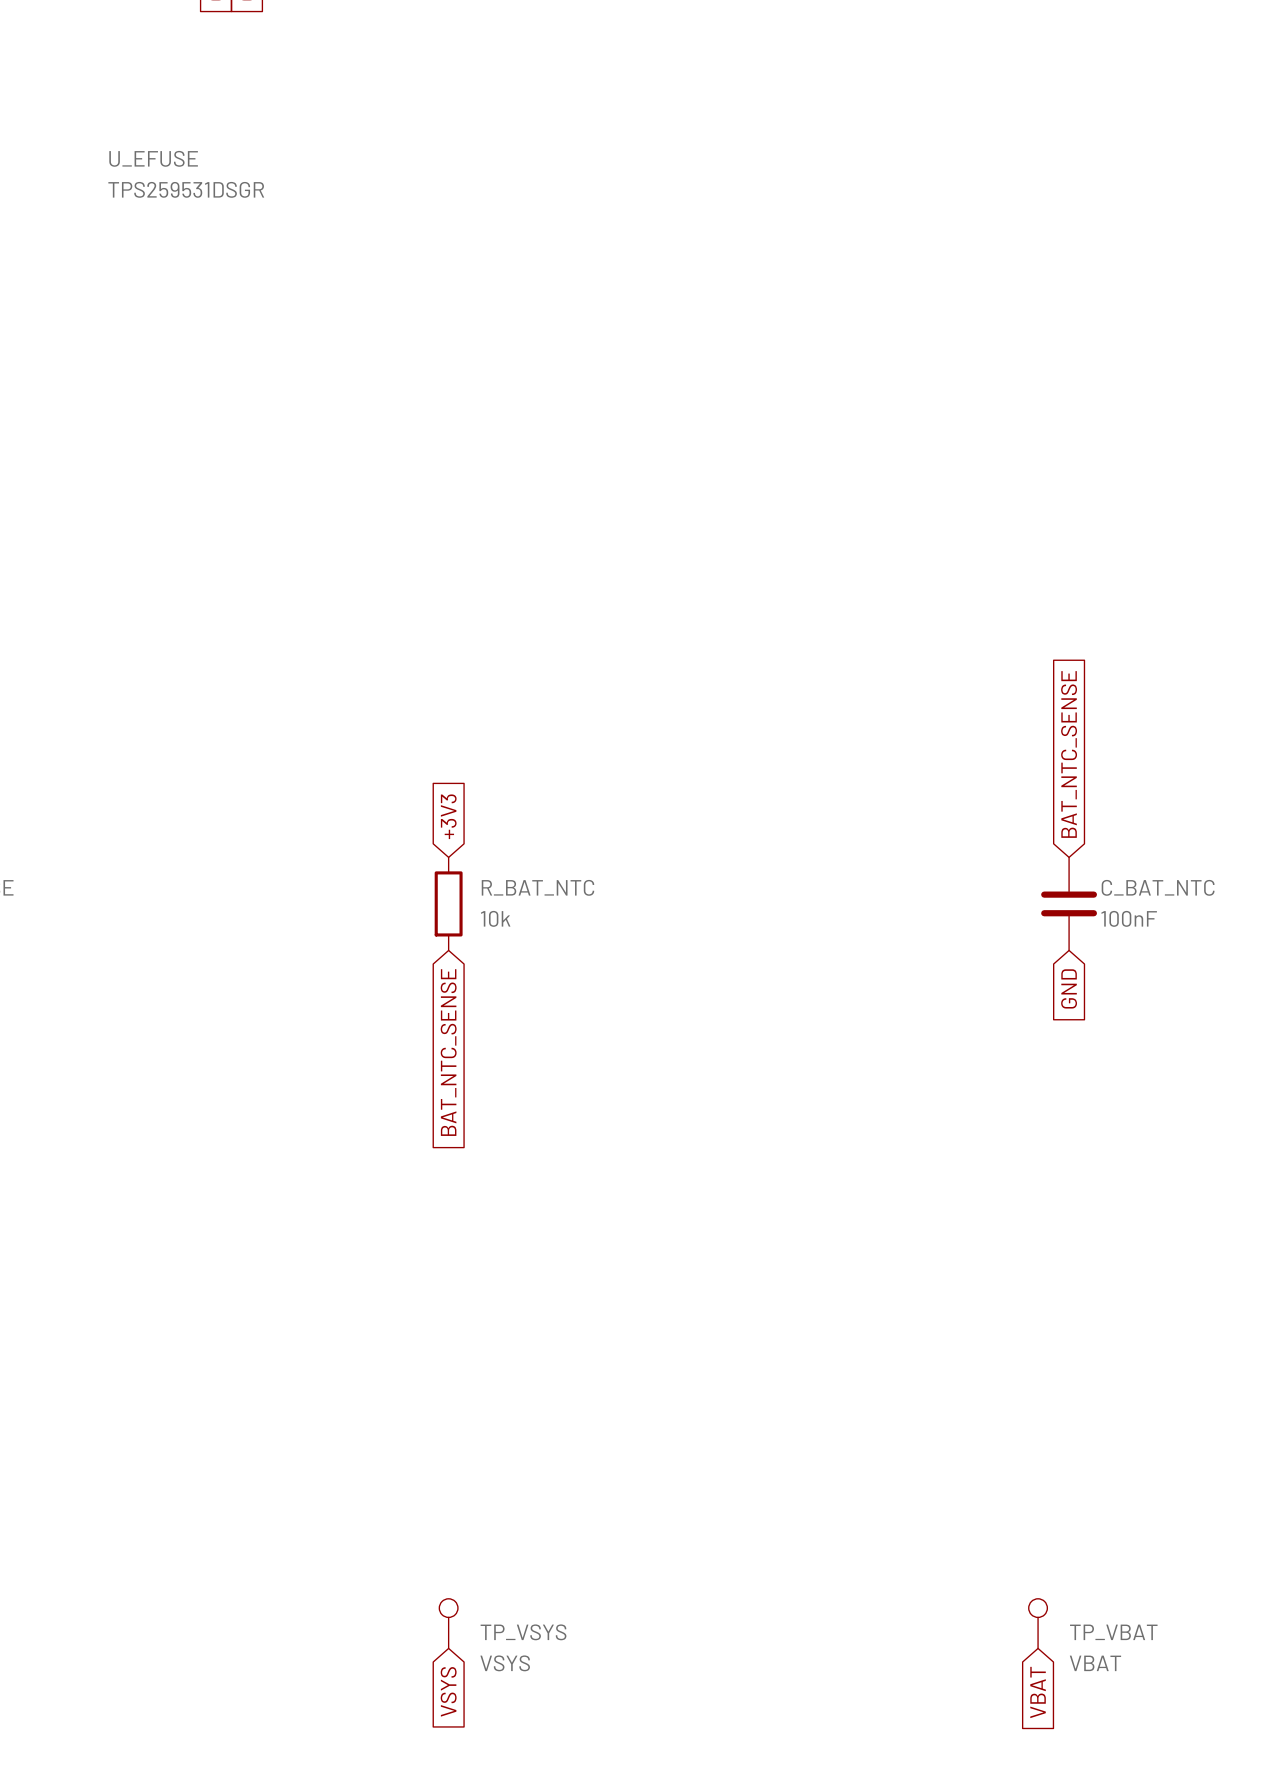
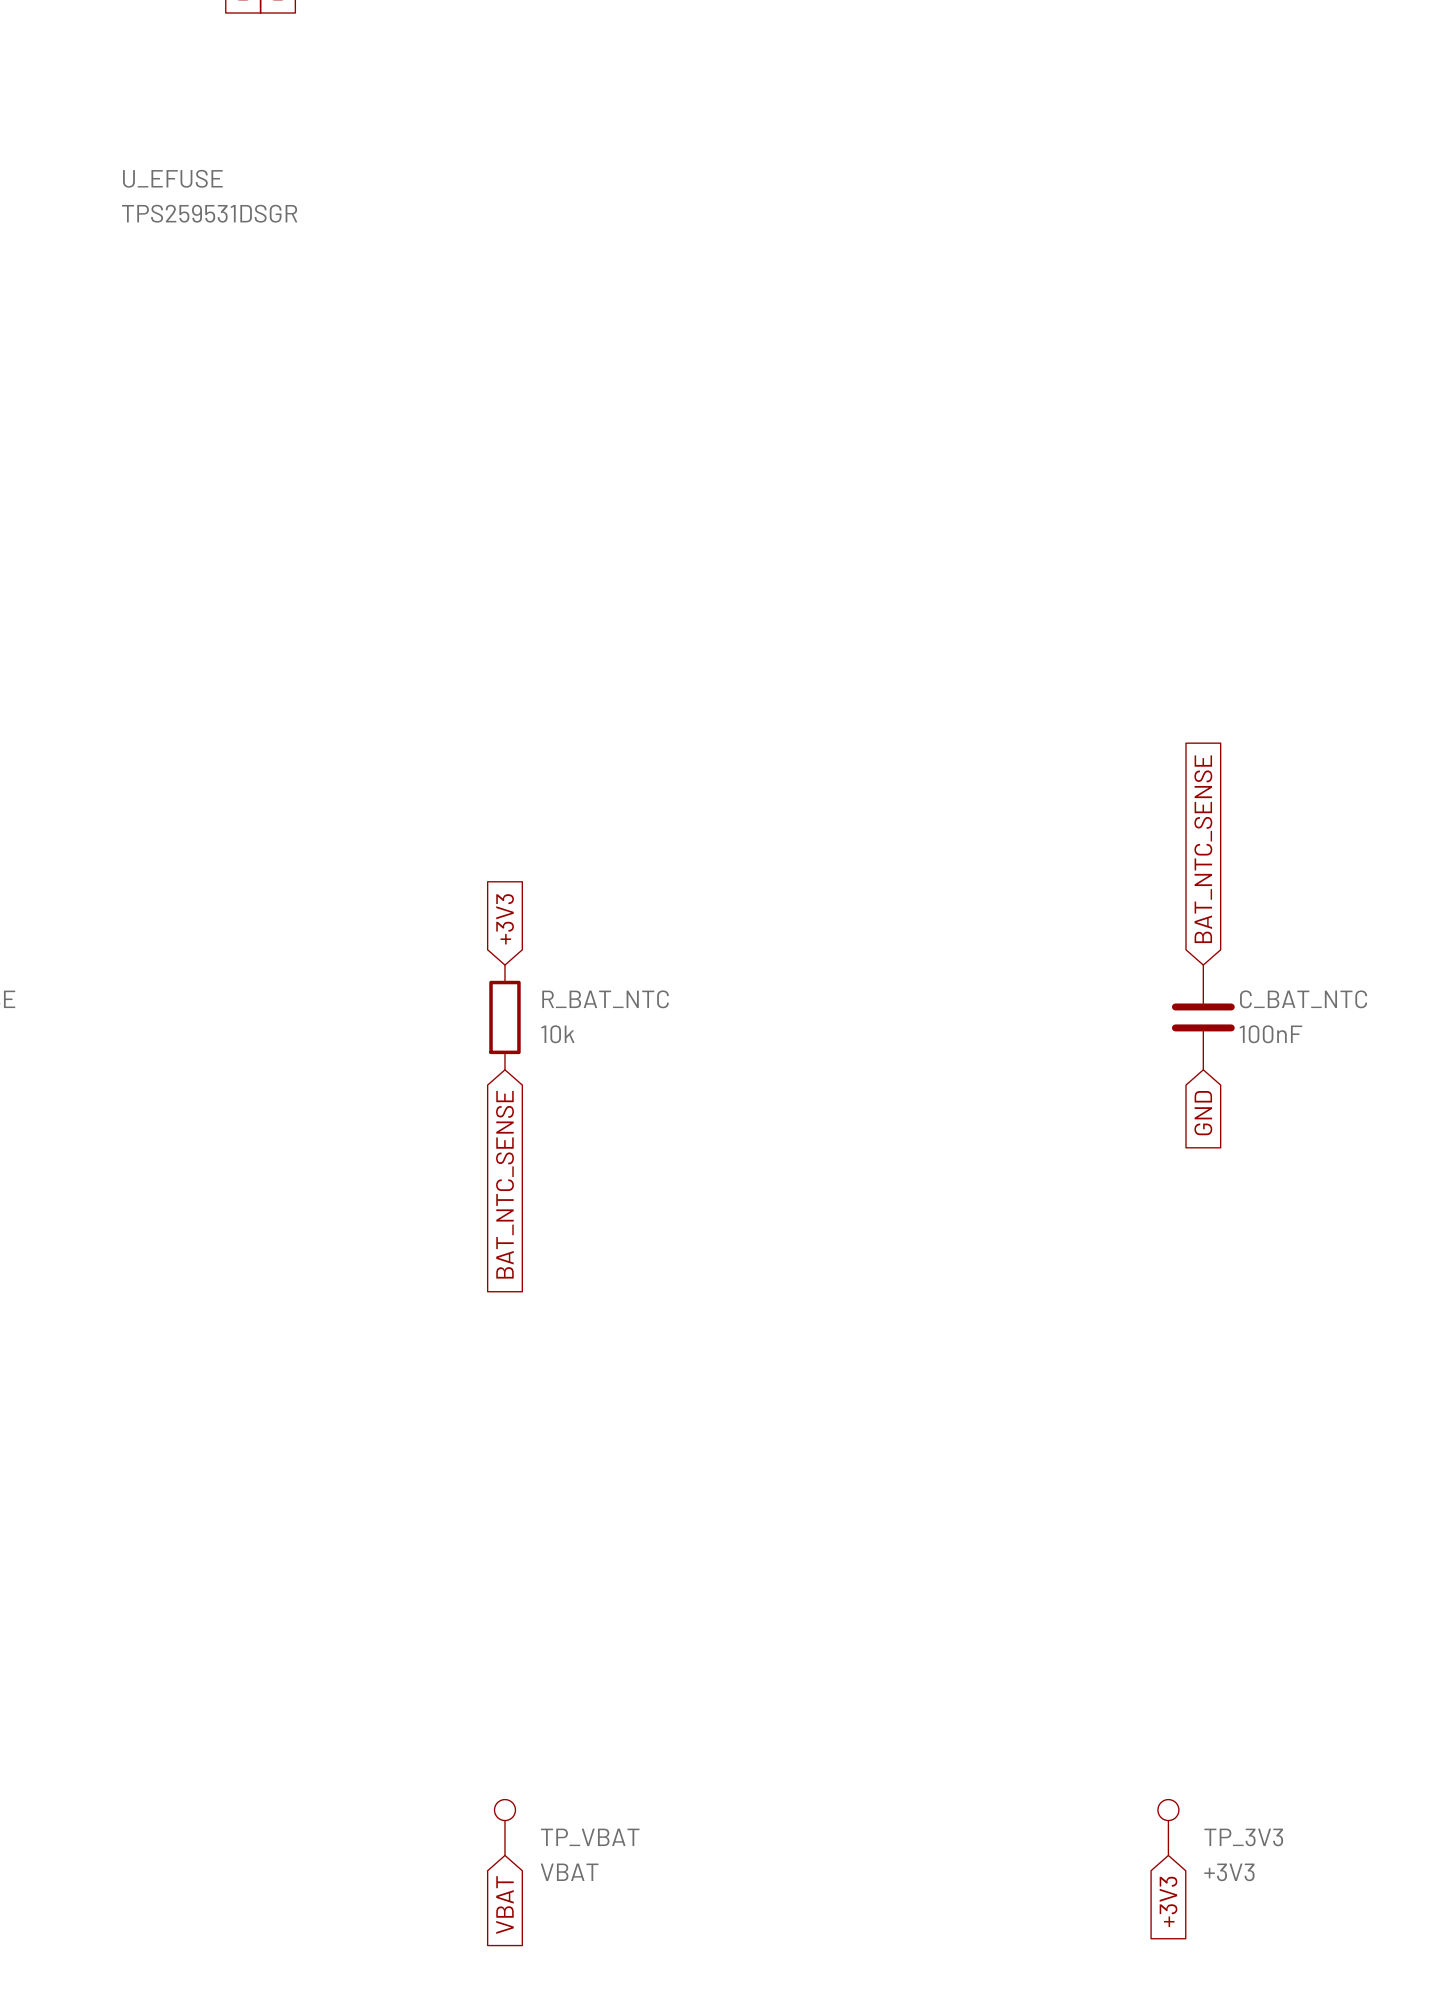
TP_VSYS name: TP_VSYS (523, 1632) -> TP_VBAT (590, 1837)
TP_VBAT name: TP_VBAT (1113, 1632) -> TP_3V3 (1243, 1837)
TP_VSYS value: VSYS (505, 1663) -> VBAT (569, 1872)
TP_VBAT value: VBAT (1095, 1663) -> +3V3 (1229, 1872)
global label: VSYS (448, 1691) -> VBAT (504, 1905)
global label: VBAT (1038, 1692) -> +3V3 (1168, 1901)

